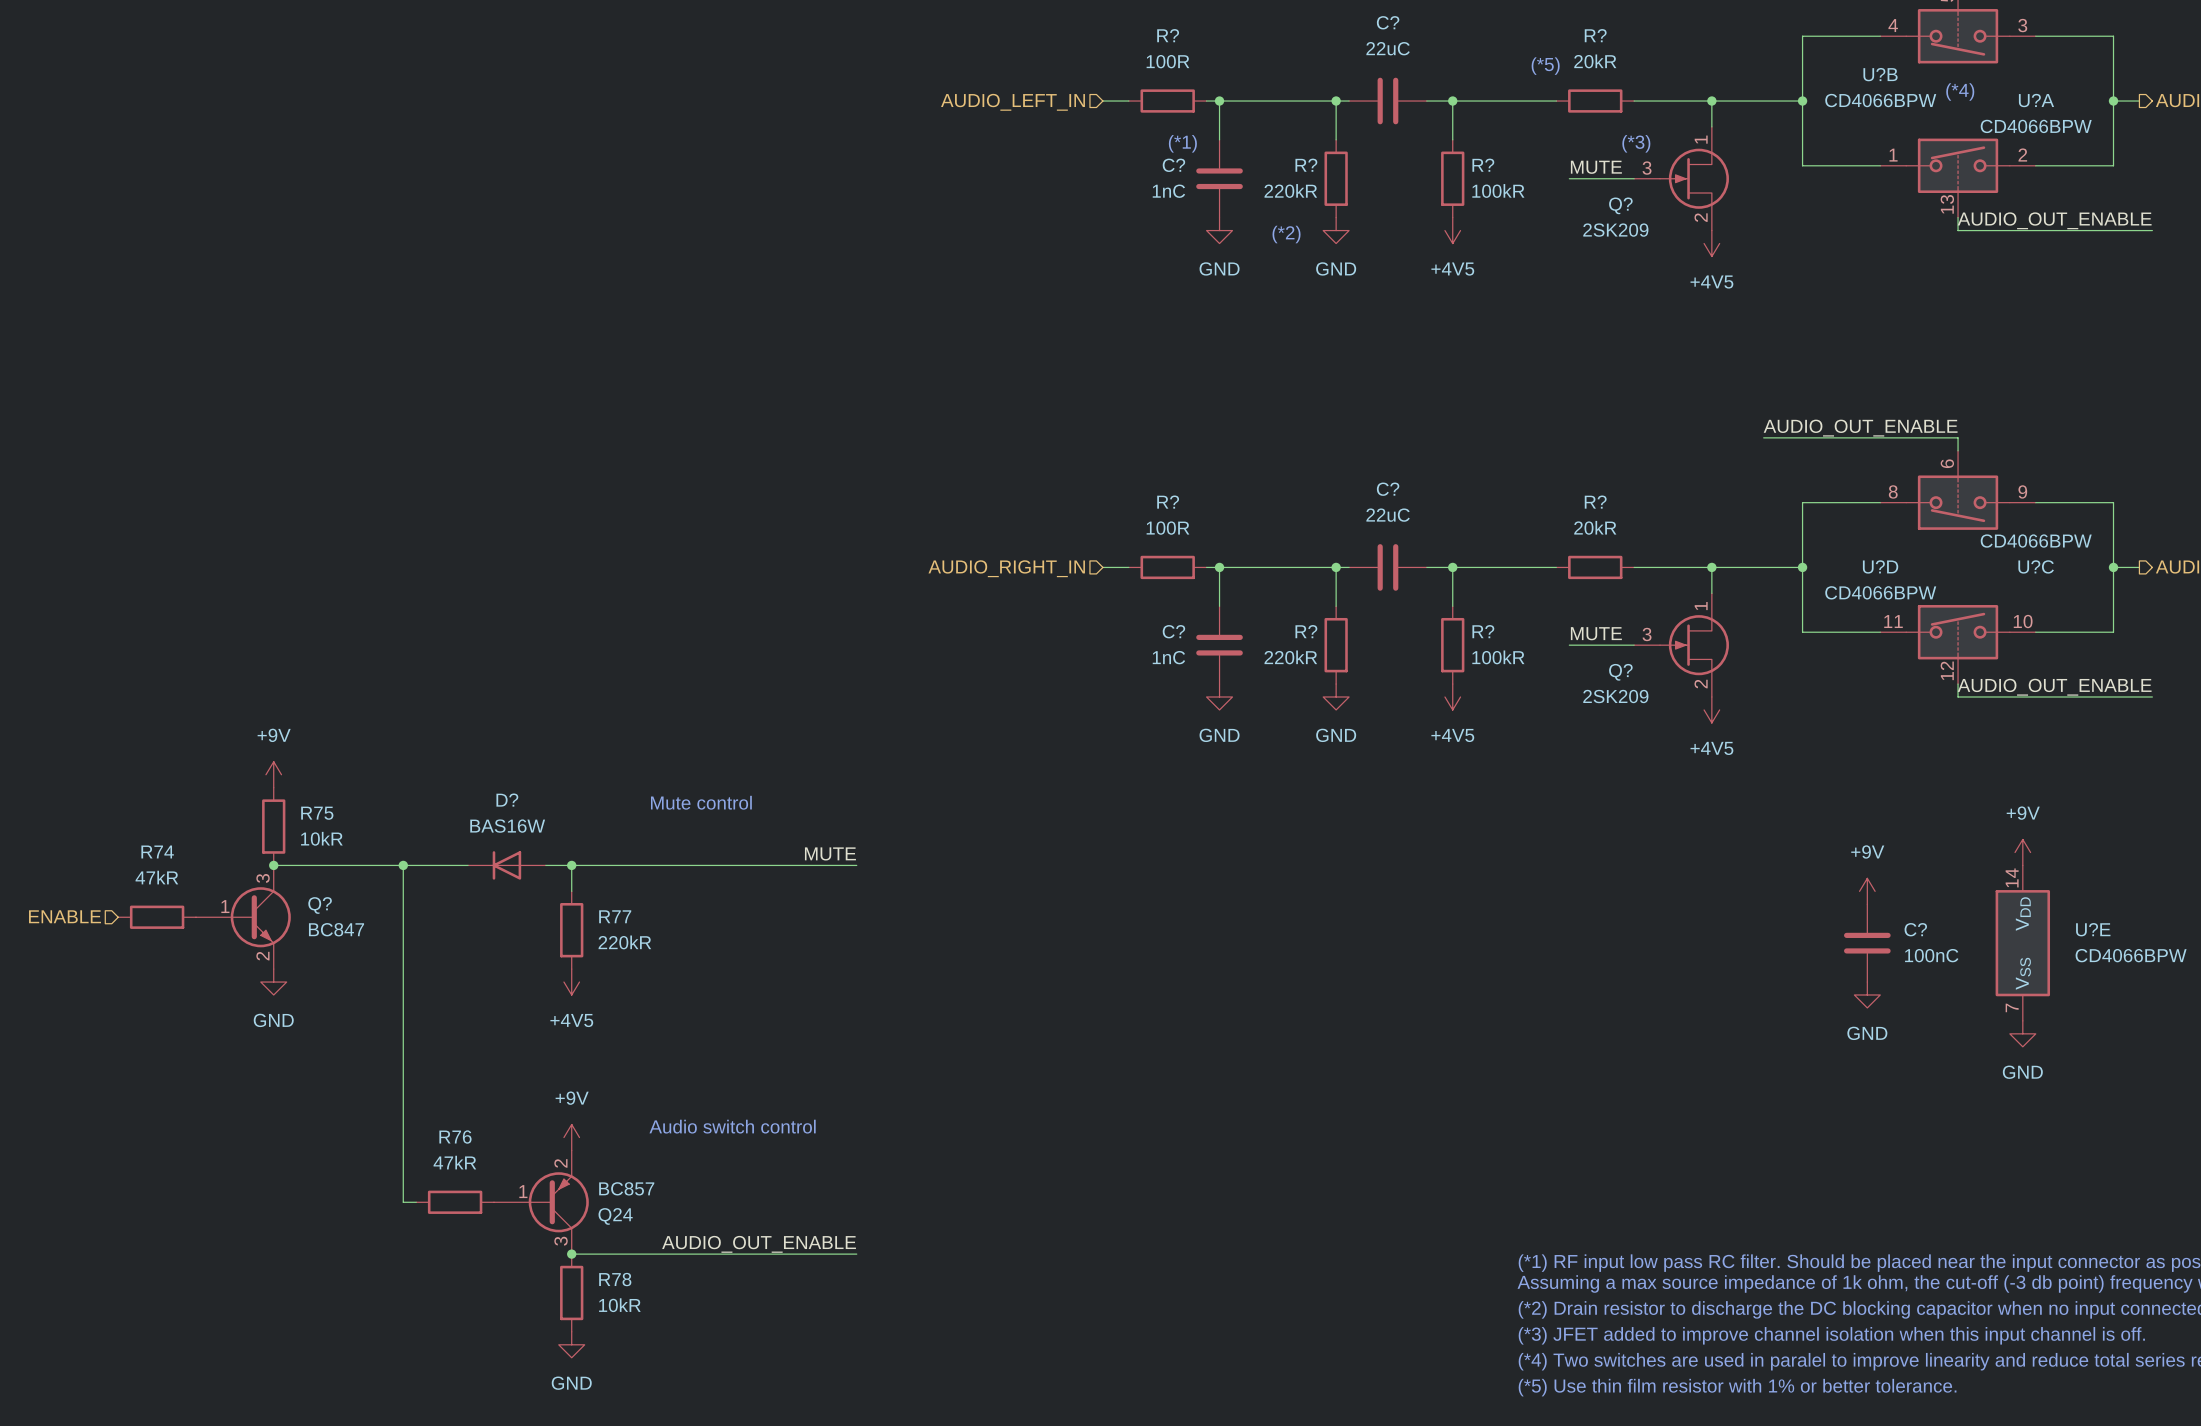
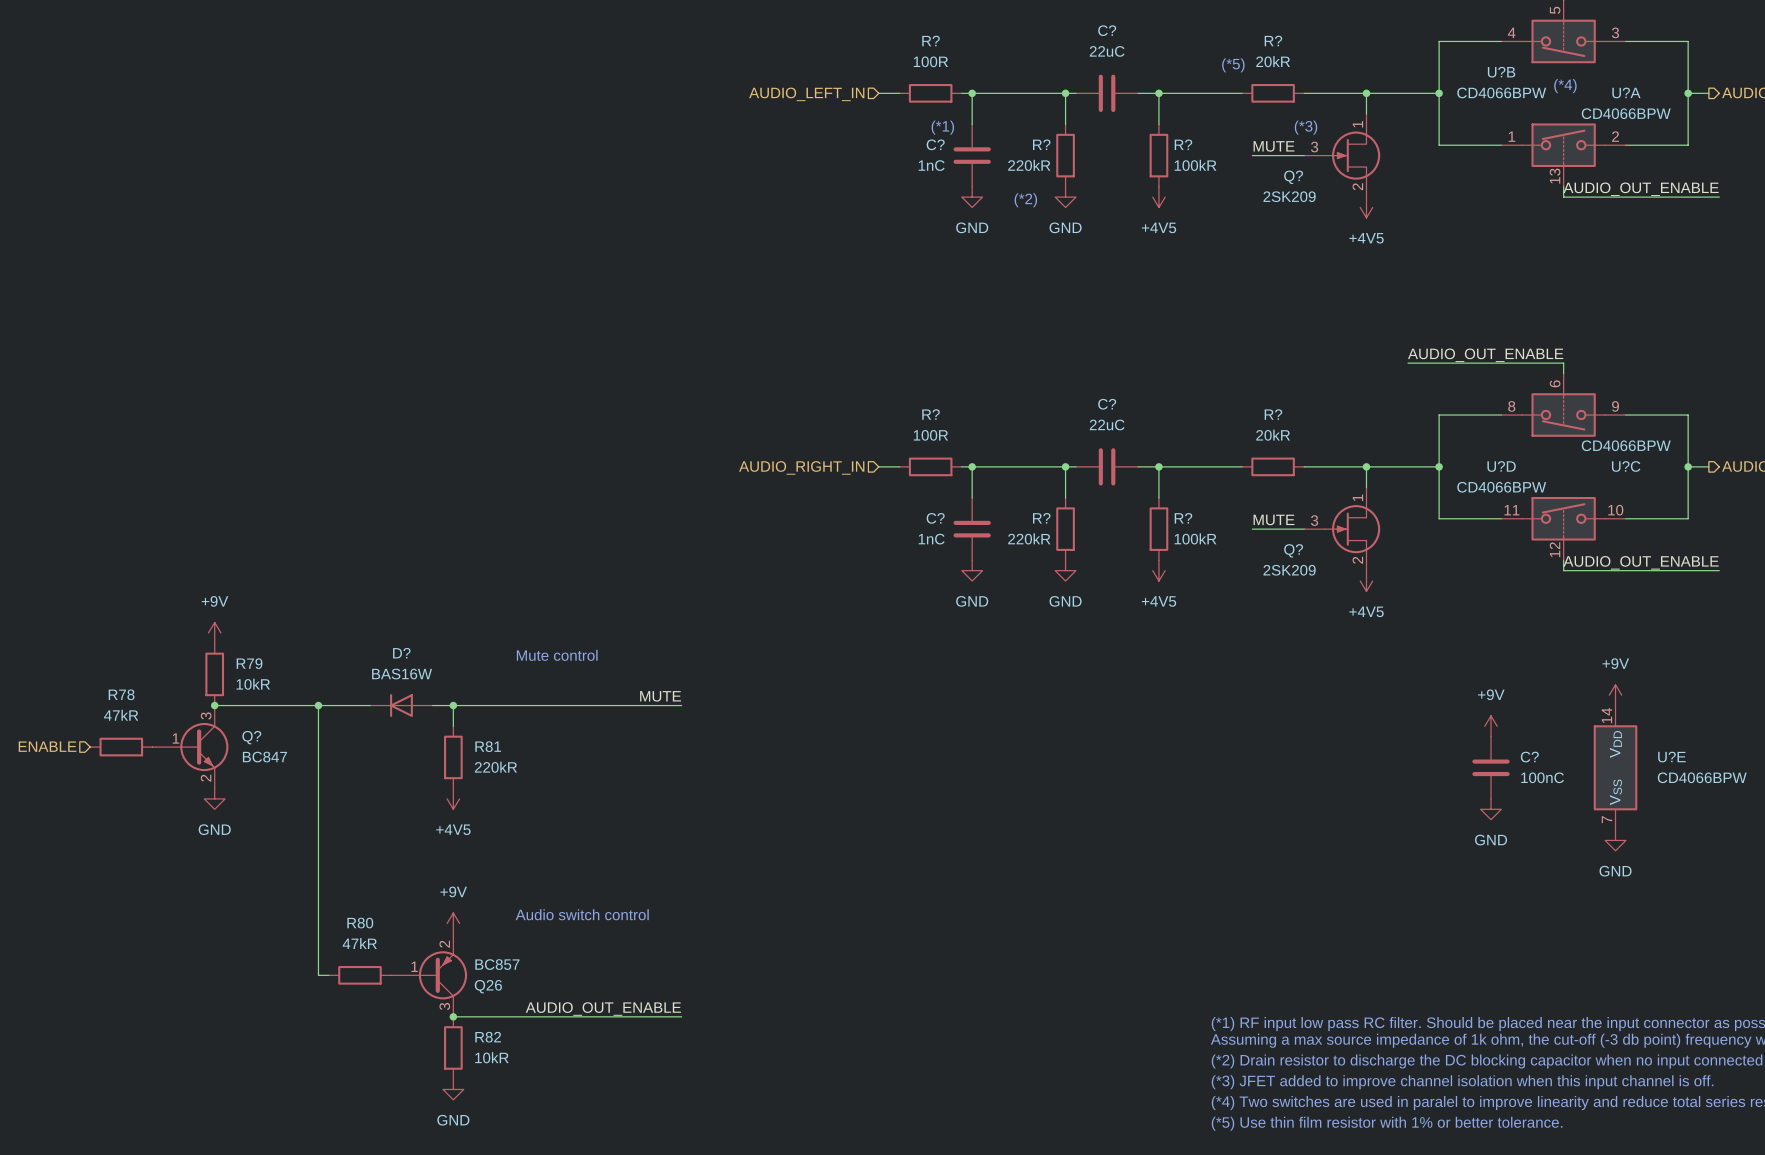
R75 name: R75 (317, 813) -> R79 (249, 663)
R74 name: R74 (157, 851) -> R78 (121, 694)
R77 name: R77 (615, 916) -> R81 (488, 746)
R76 name: R76 (455, 1137) -> R80 (360, 923)
Q24 name: Q24 (615, 1216) -> Q26 (488, 986)
R78 name: R78 (615, 1279) -> R82 (488, 1037)

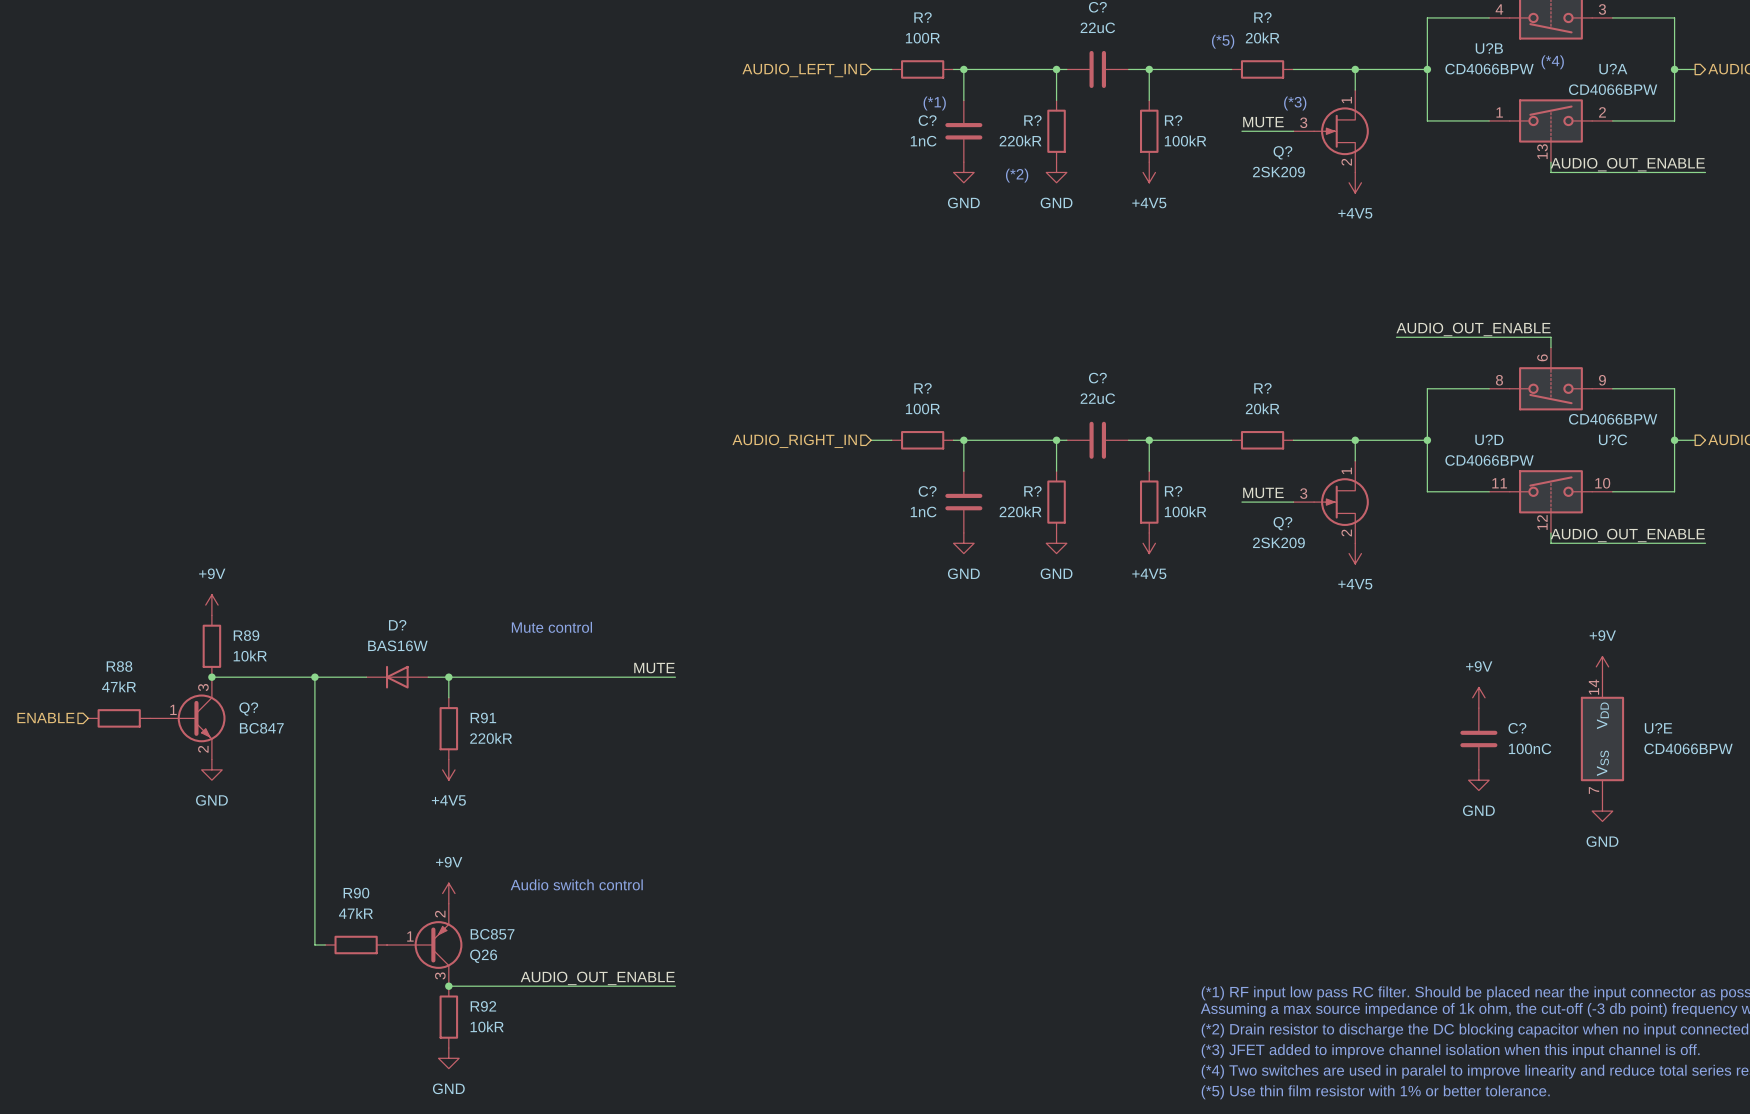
R79 name: R79 (249, 663) -> R89 (246, 635)
R78 name: R78 (121, 694) -> R88 (119, 666)
R81 name: R81 (488, 746) -> R91 (483, 718)
R80 name: R80 (360, 923) -> R90 (356, 893)
R82 name: R82 (488, 1037) -> R92 (483, 1006)

